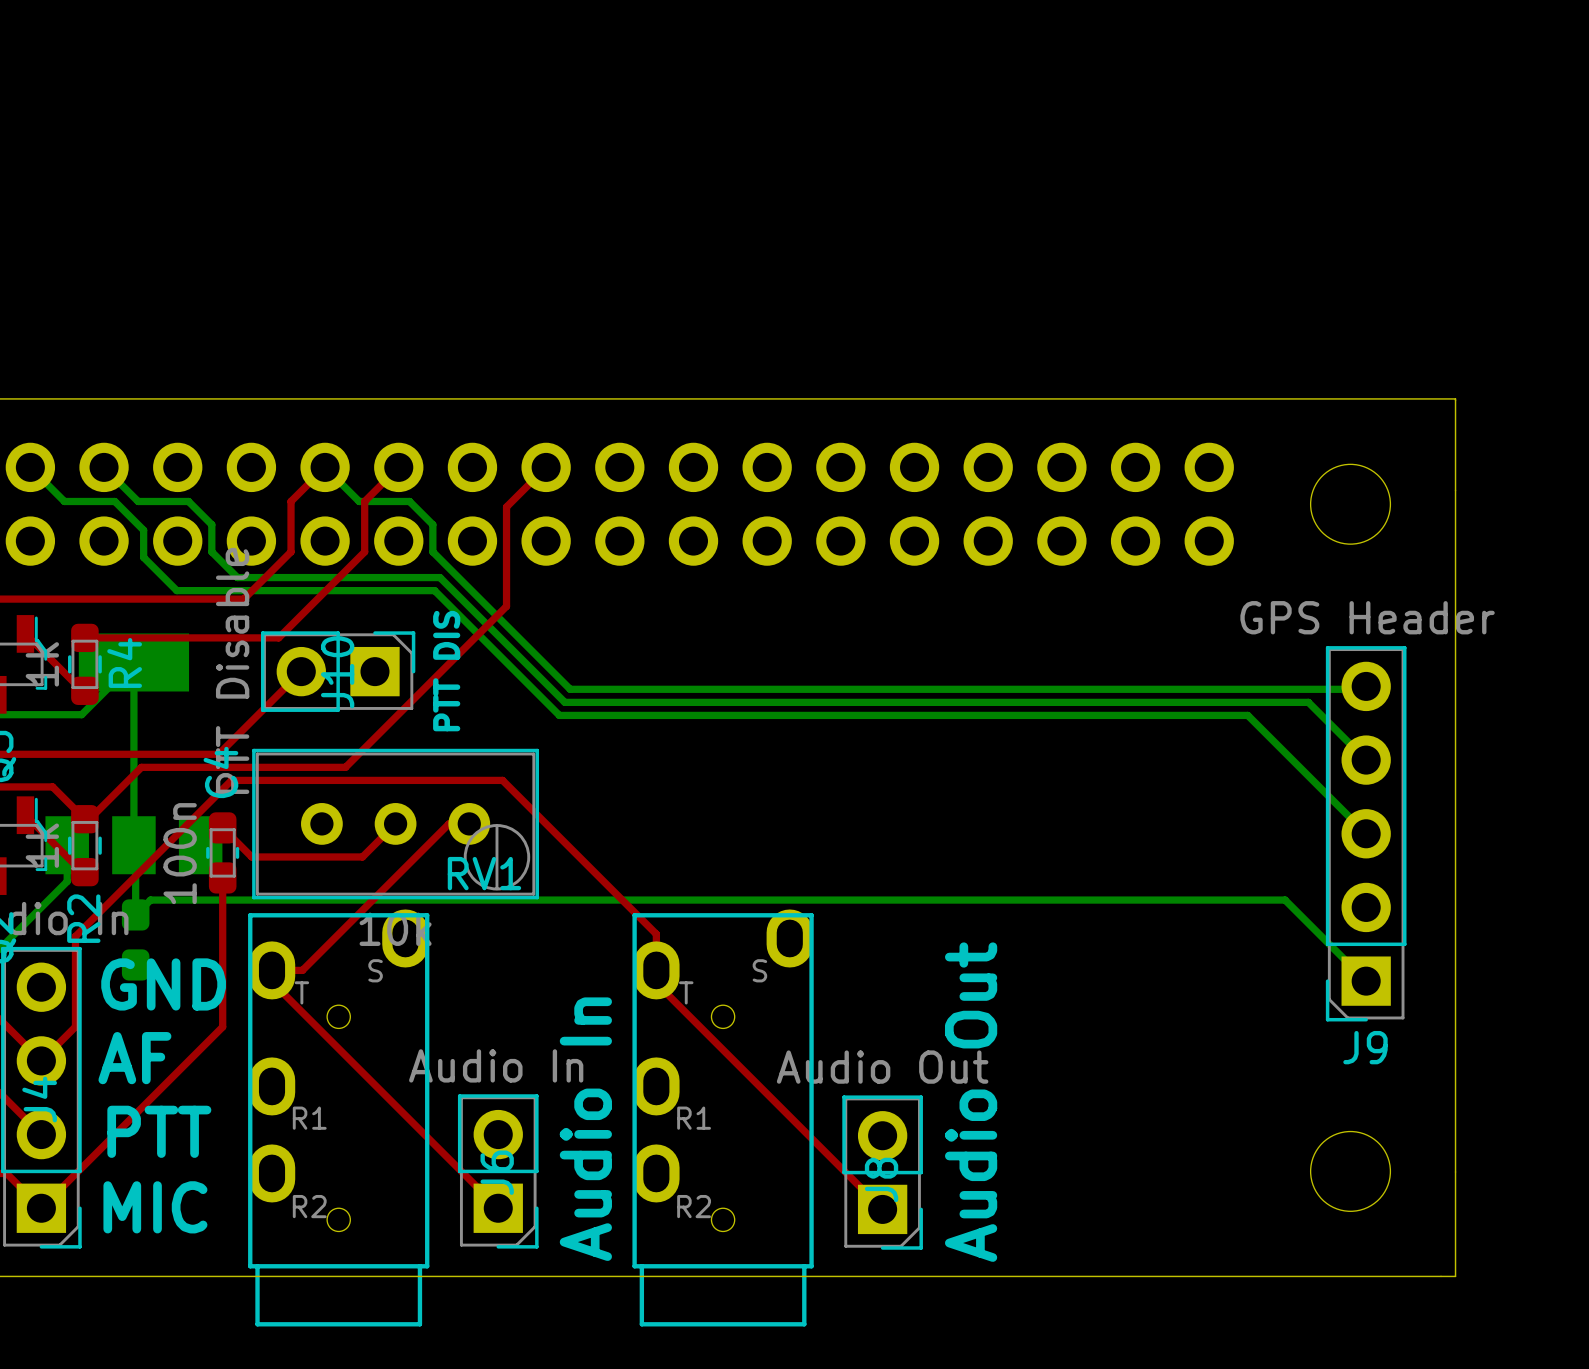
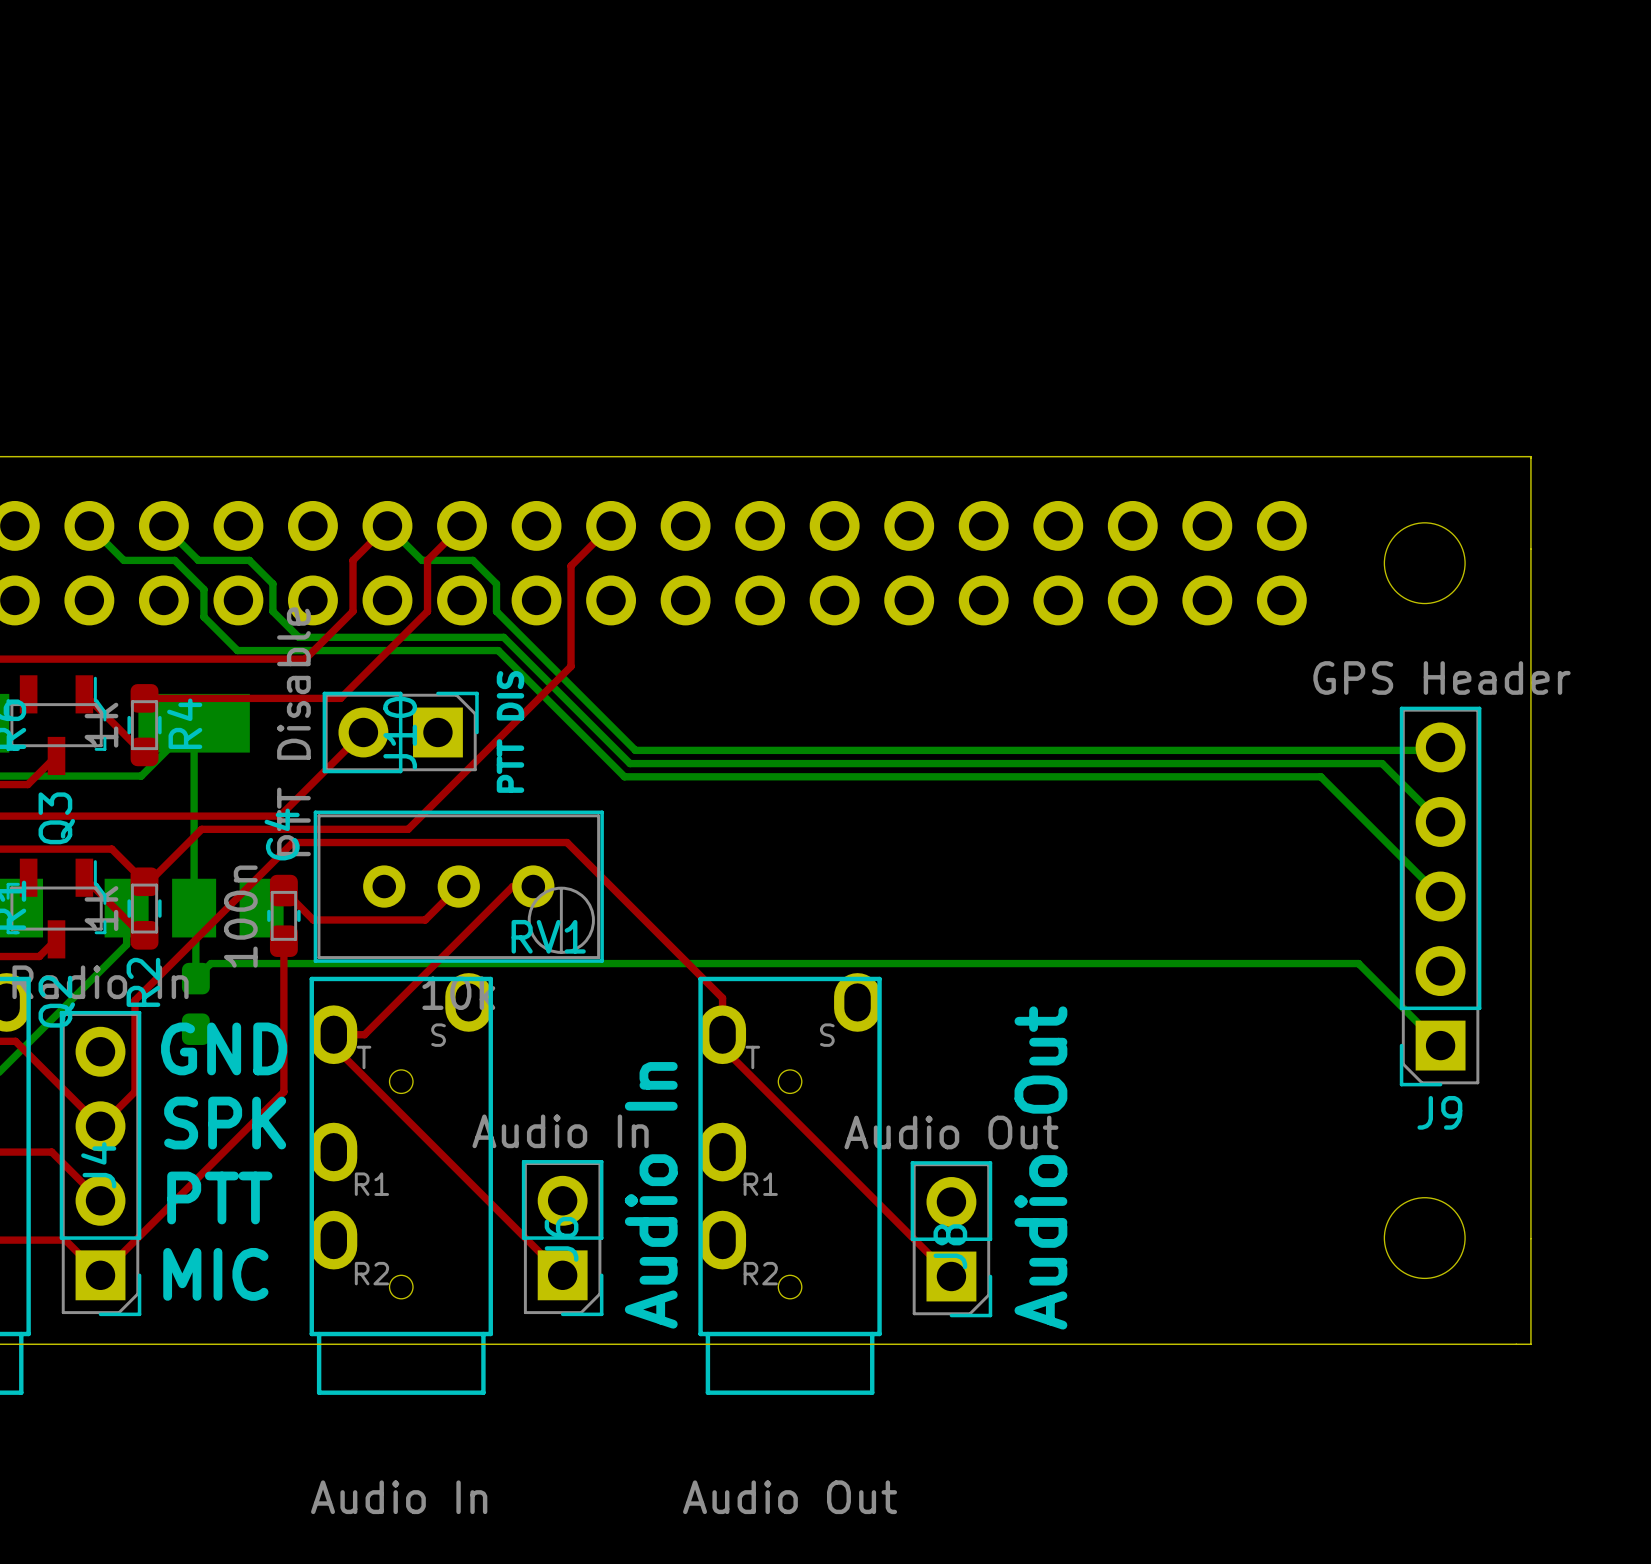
text: AF (134, 1058) -> SPK (225, 1123)

